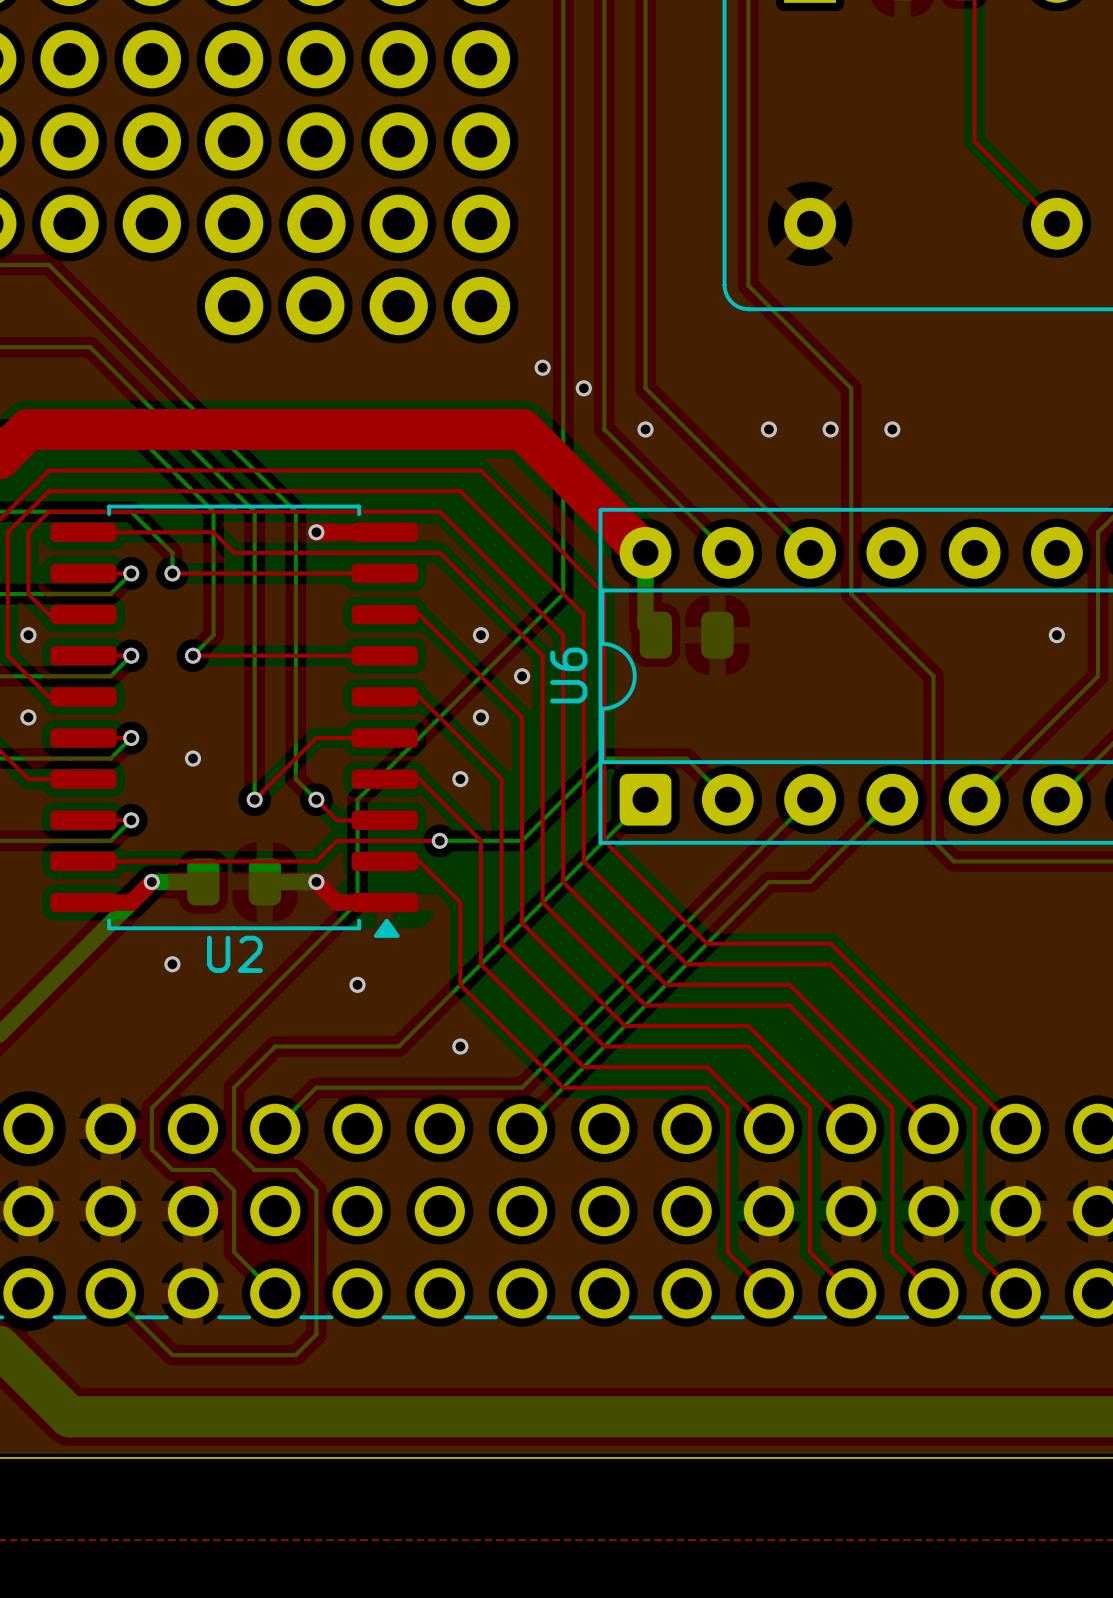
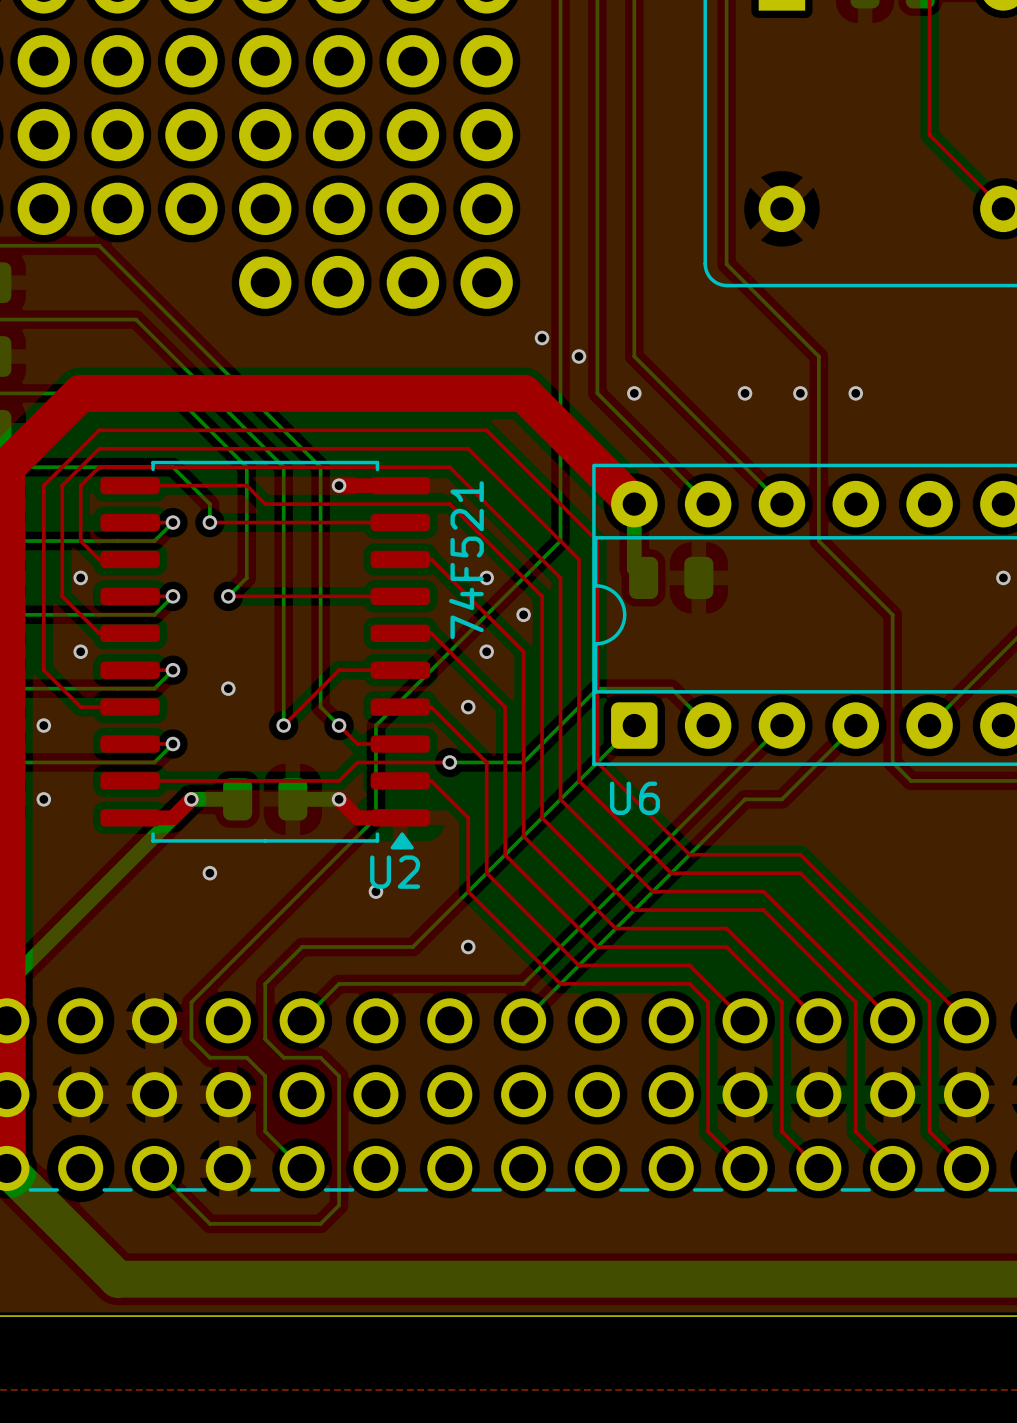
U2 value: none -> 74F521 (466, 560)
U6 name rotation: 0° (568, 675) -> 90° clockwise (635, 798)
U6 name position: U6 (568, 675) -> U6 (635, 798)
U2 name position: U2 (234, 954) -> U2 (395, 872)

